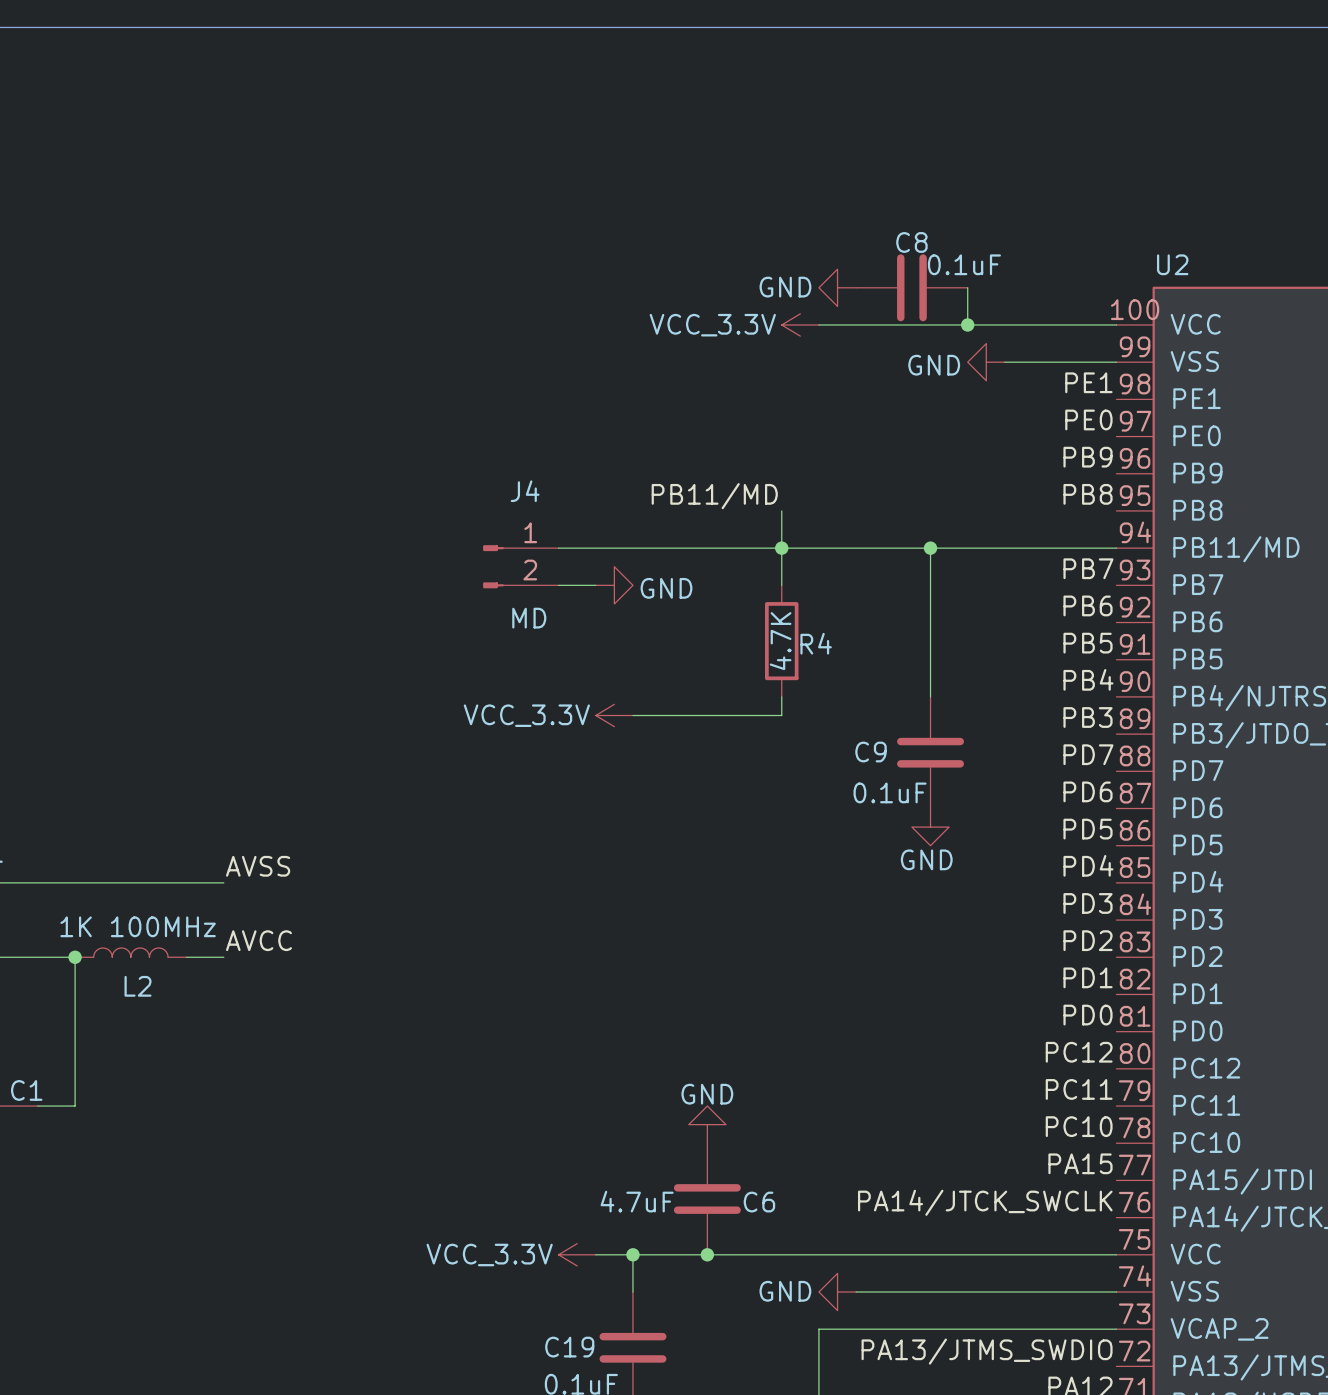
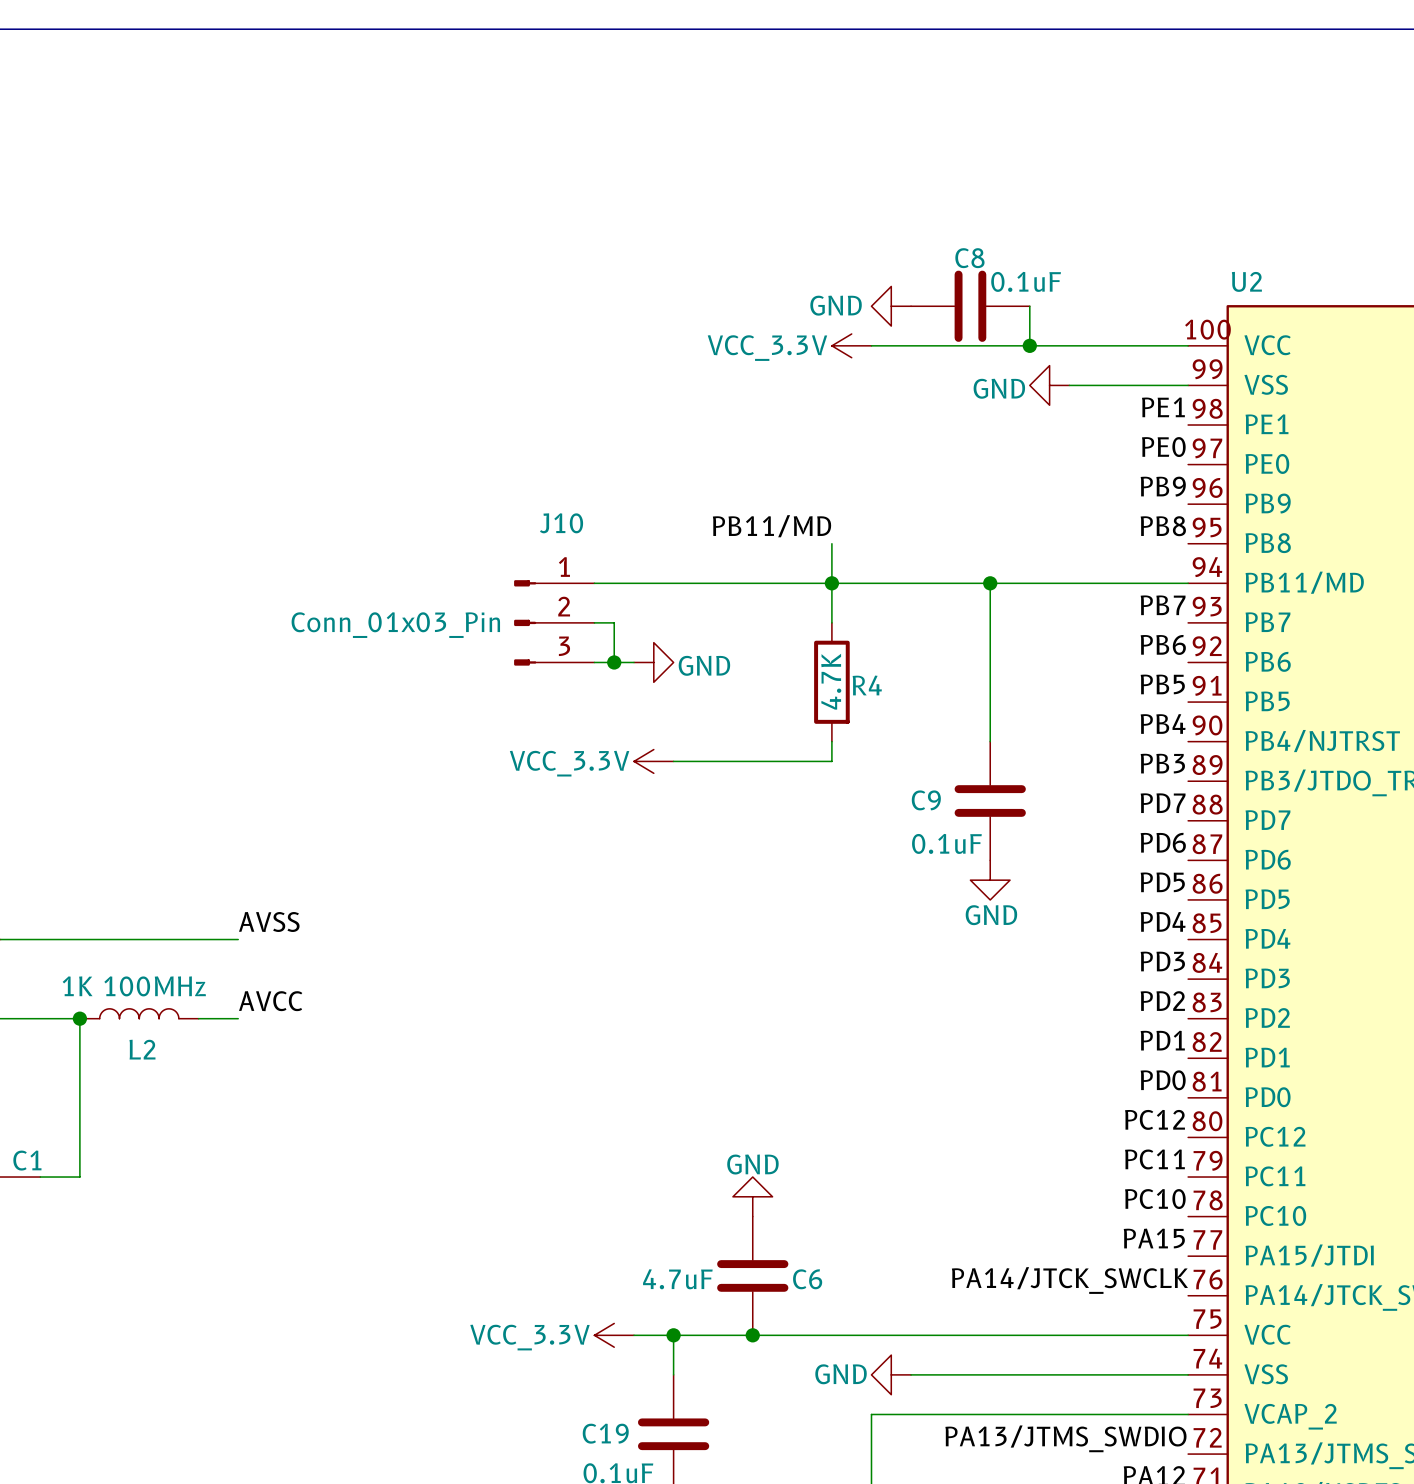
J4: MD (520, 566) -> none
J10: none -> Conn_01x03_Pin (554, 622)
wire: (577, 585) (595, 585) -> (614, 622) (614, 662)
power symbol position: GND (614, 585) -> GND (653, 662)
wire: none -> (594, 662) (634, 662)
junction: none -> (614, 662)

